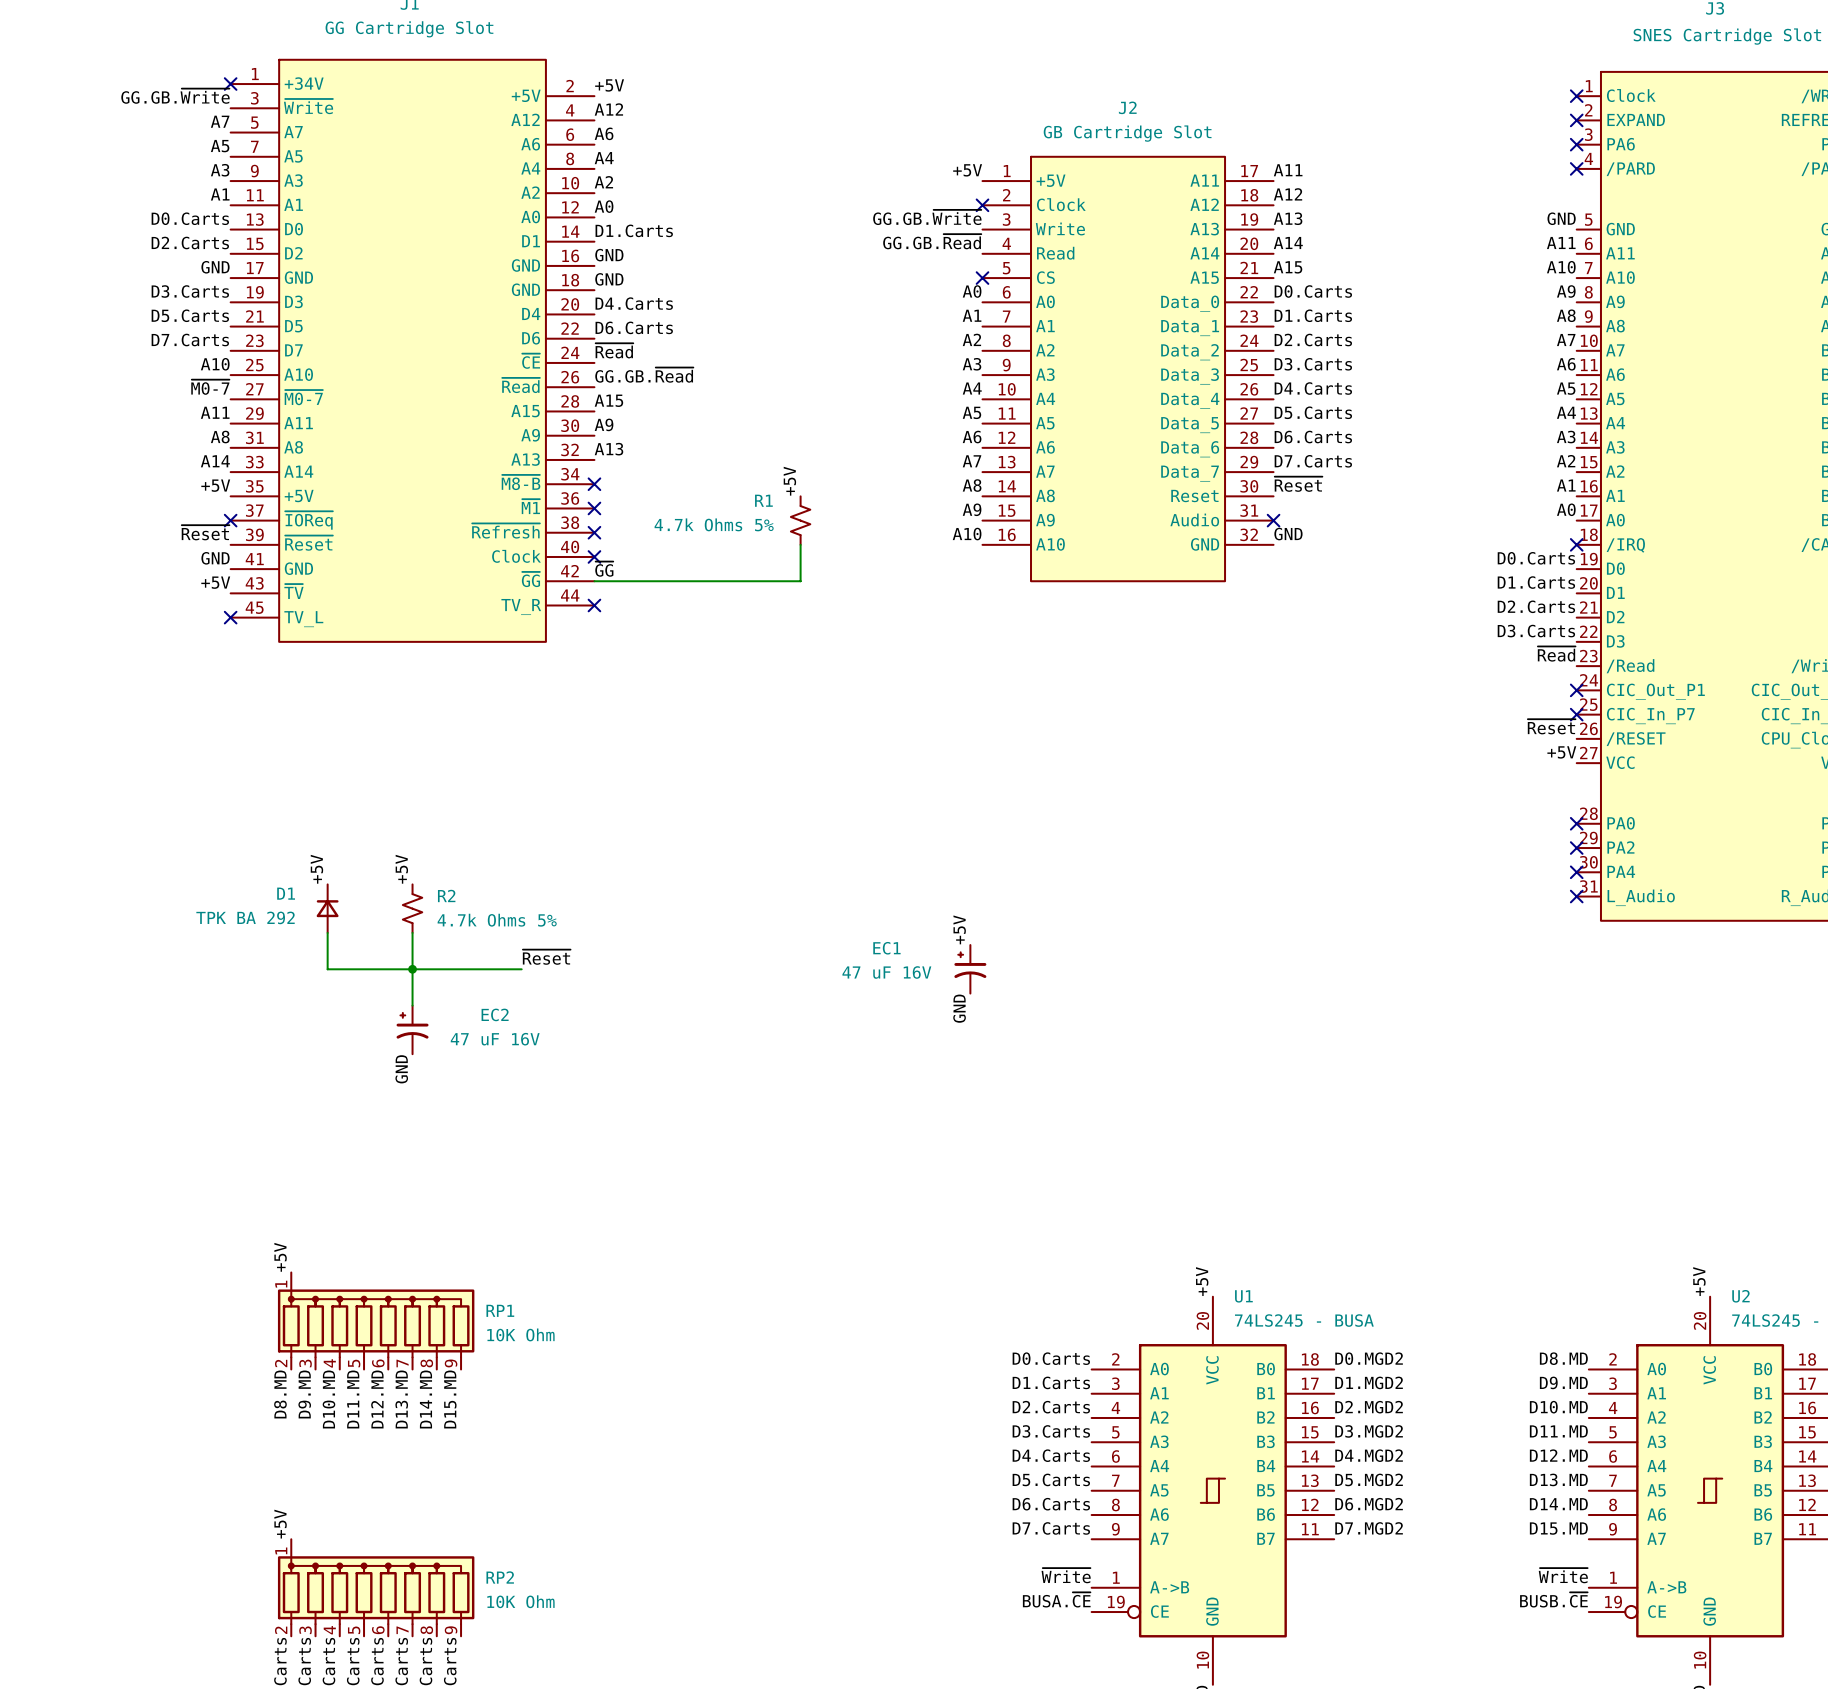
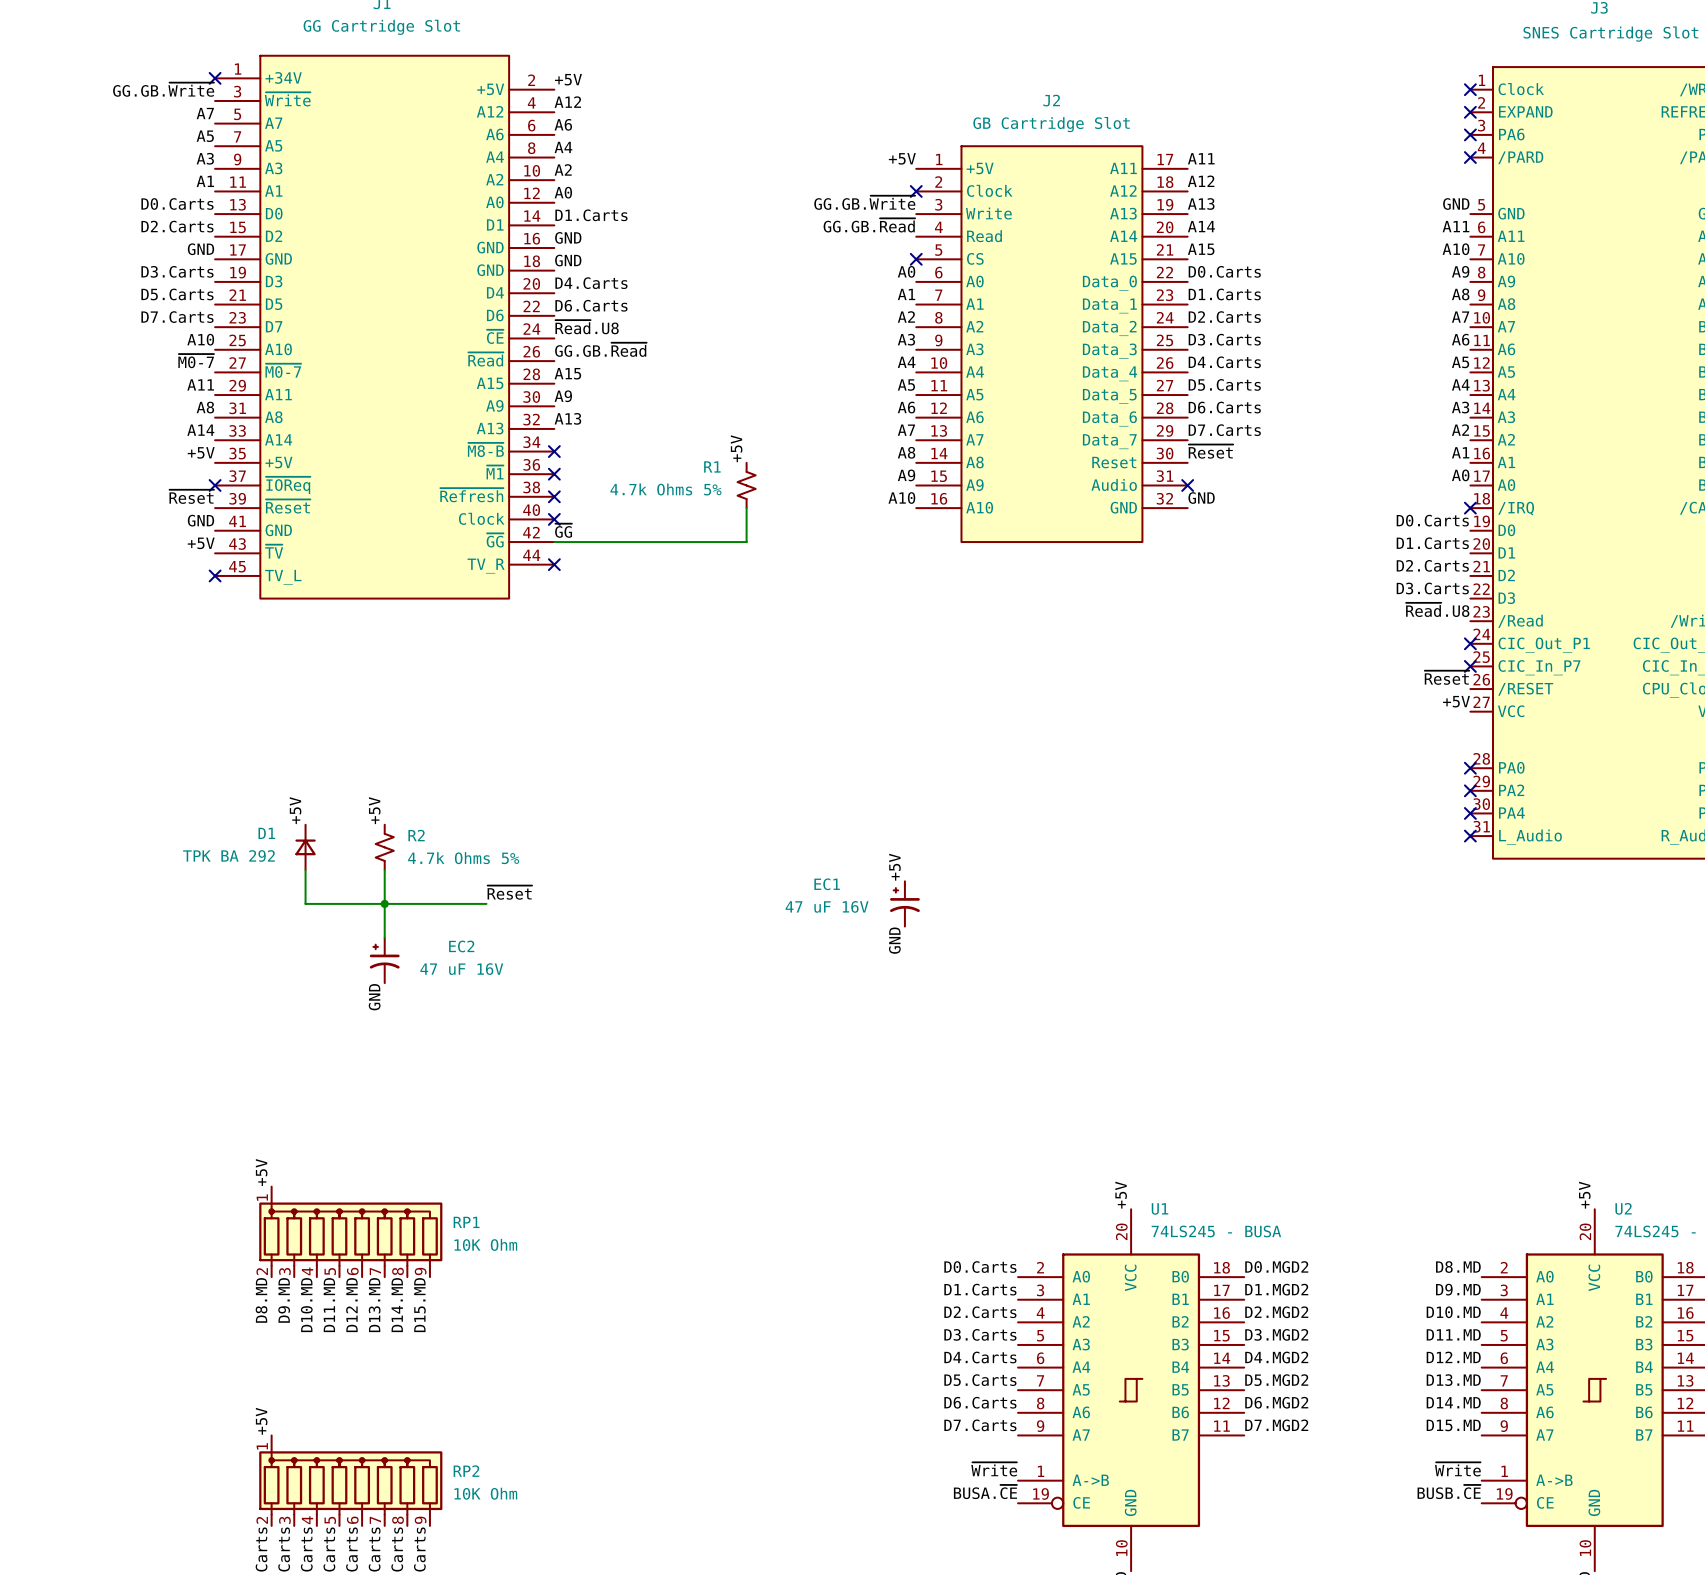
label: ~{Read} (614, 350) -> ~{Read}.U8 (587, 327)
label: ~{Read} (1556, 654) -> ~{Read}.U8 (1437, 609)

